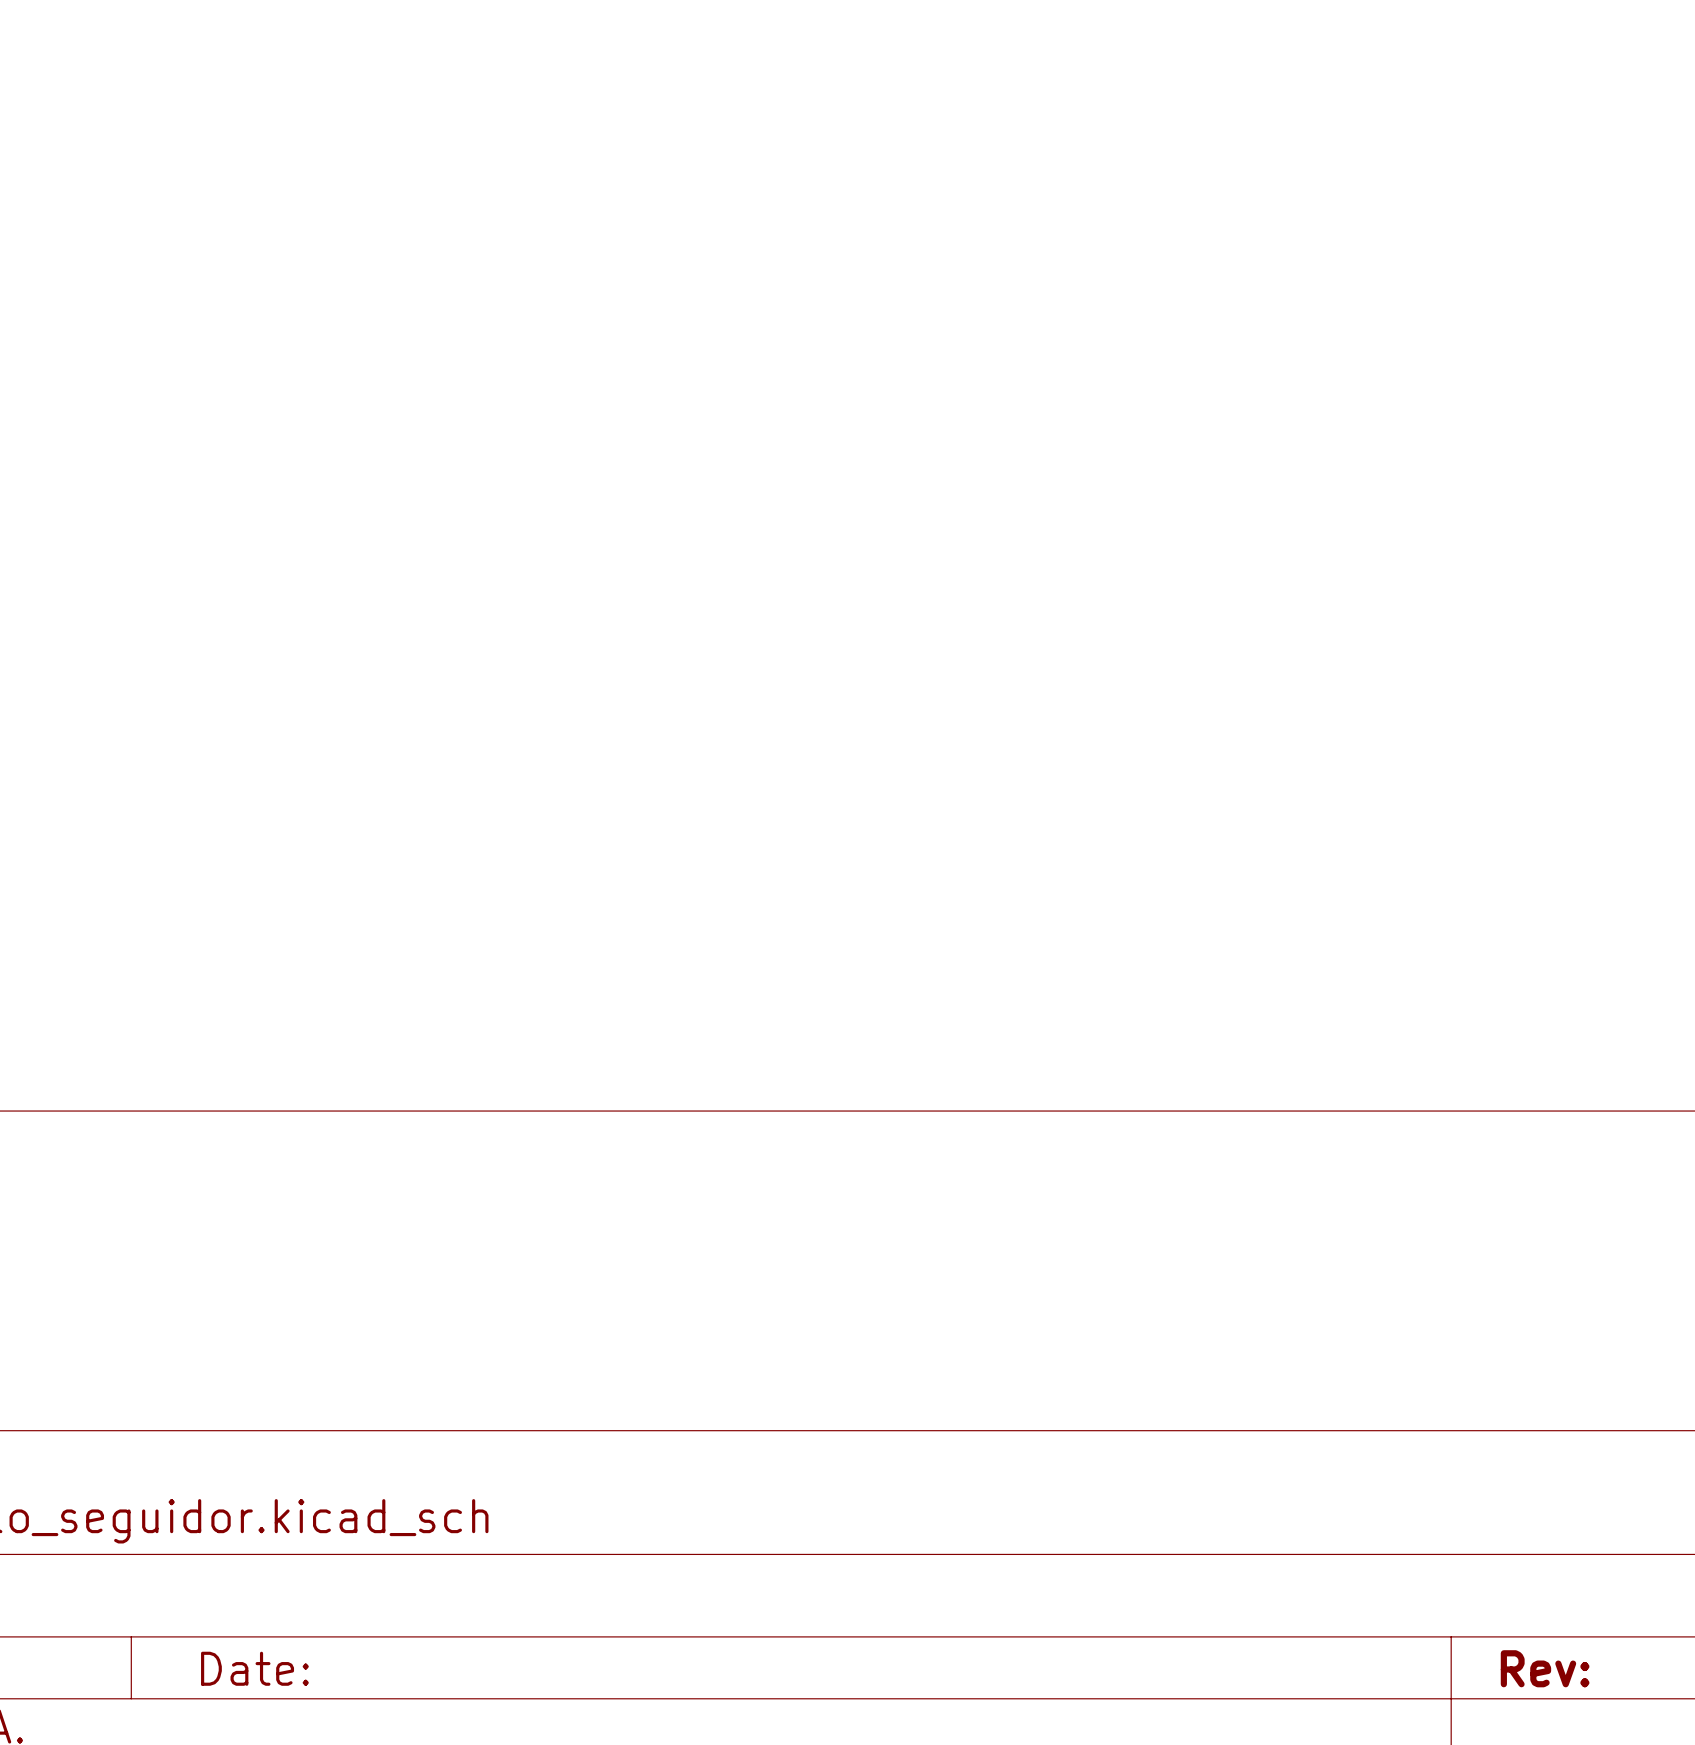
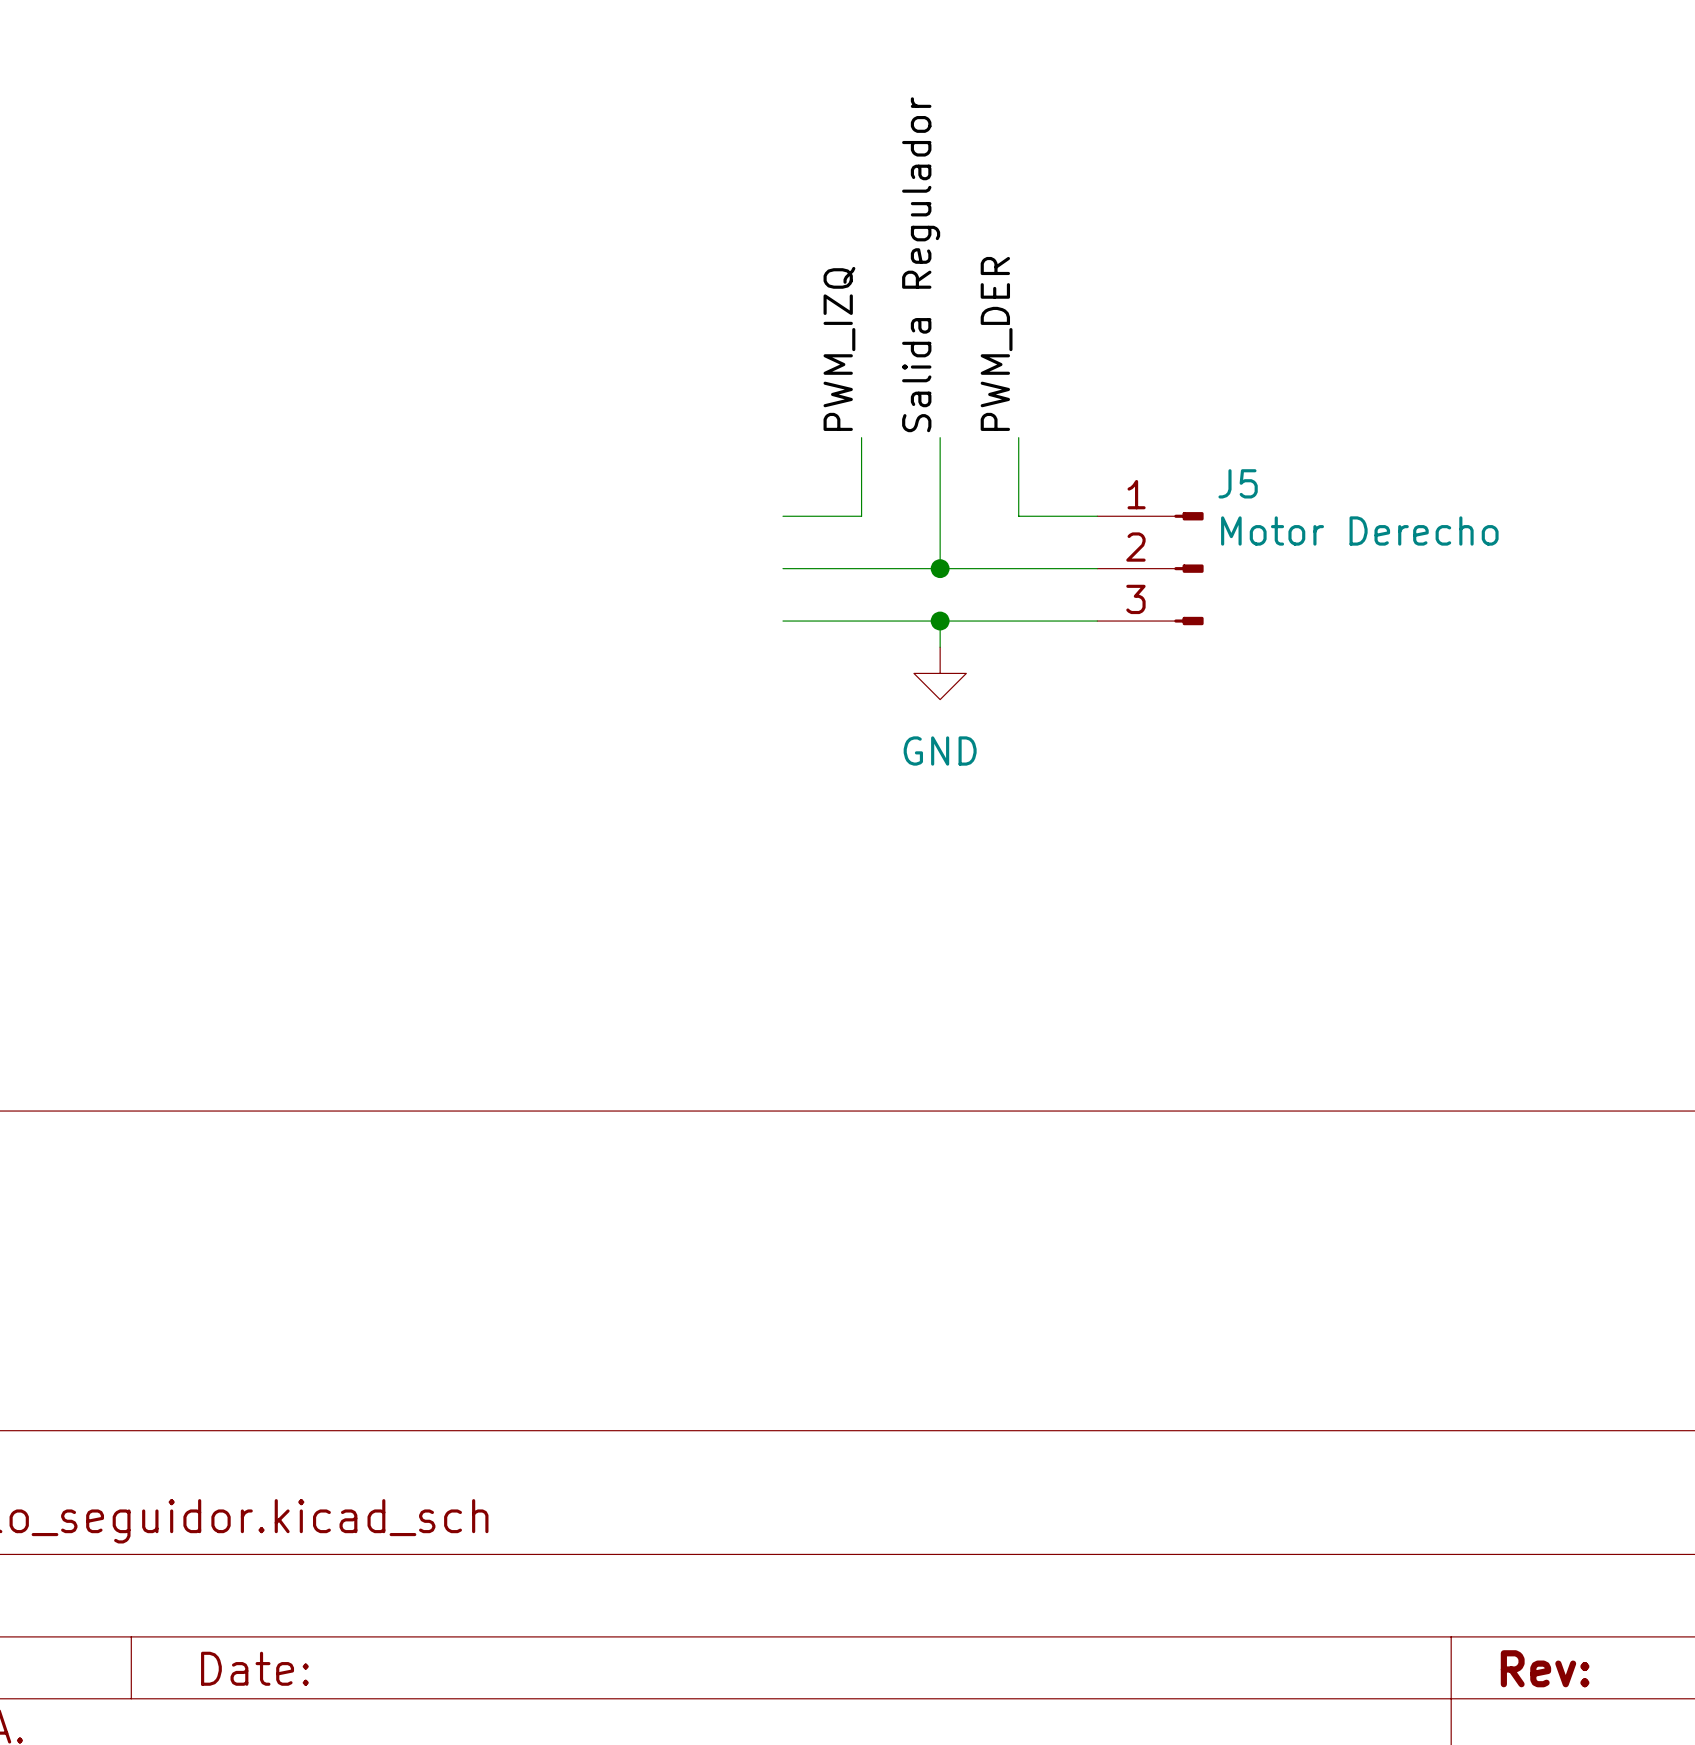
label: none -> Salida Regulador (921, 264)
label: none -> PWM_DER (996, 343)
label: none -> PWM_IZQ (839, 348)
wire: none -> (861, 437) (861, 516) (782, 516)
wire: none -> (940, 437) (940, 568)
wire: none -> (1018, 437) (1018, 516) (1097, 516)
wire: none -> (782, 568) (1097, 568)
junction: none -> (940, 568)
J5: none -> Motor Derecho (1150, 568)
wire: none -> (782, 621) (1097, 621)
wire: none -> (940, 621) (940, 647)
junction: none -> (940, 621)
power symbol: none -> GND (940, 673)

